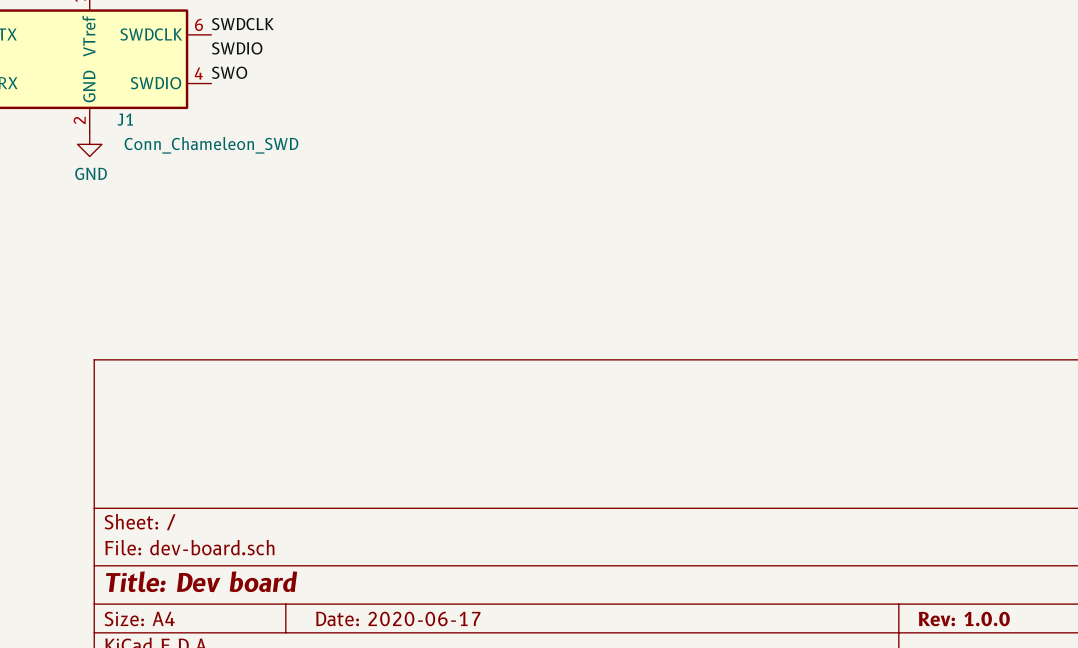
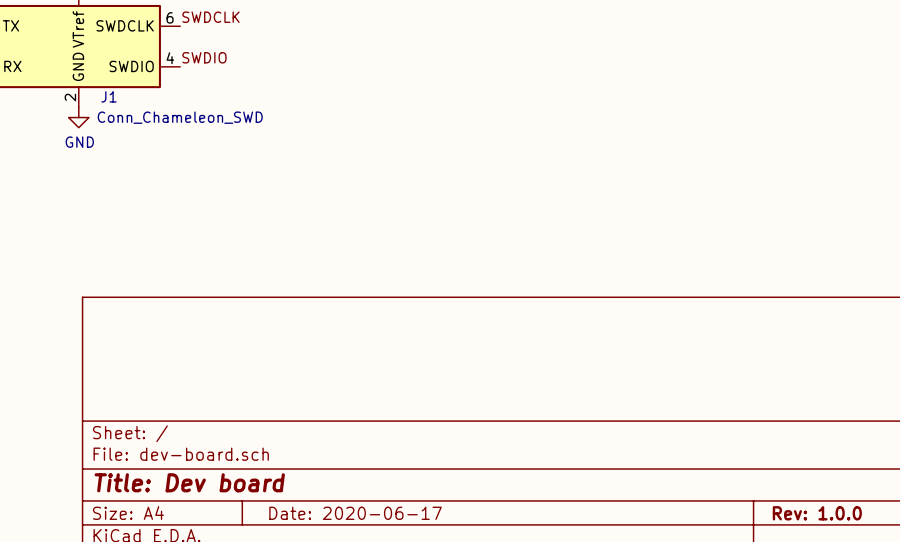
label: SWDIO (237, 48) -> none
label: SWO (229, 72) -> SWDIO (204, 57)

